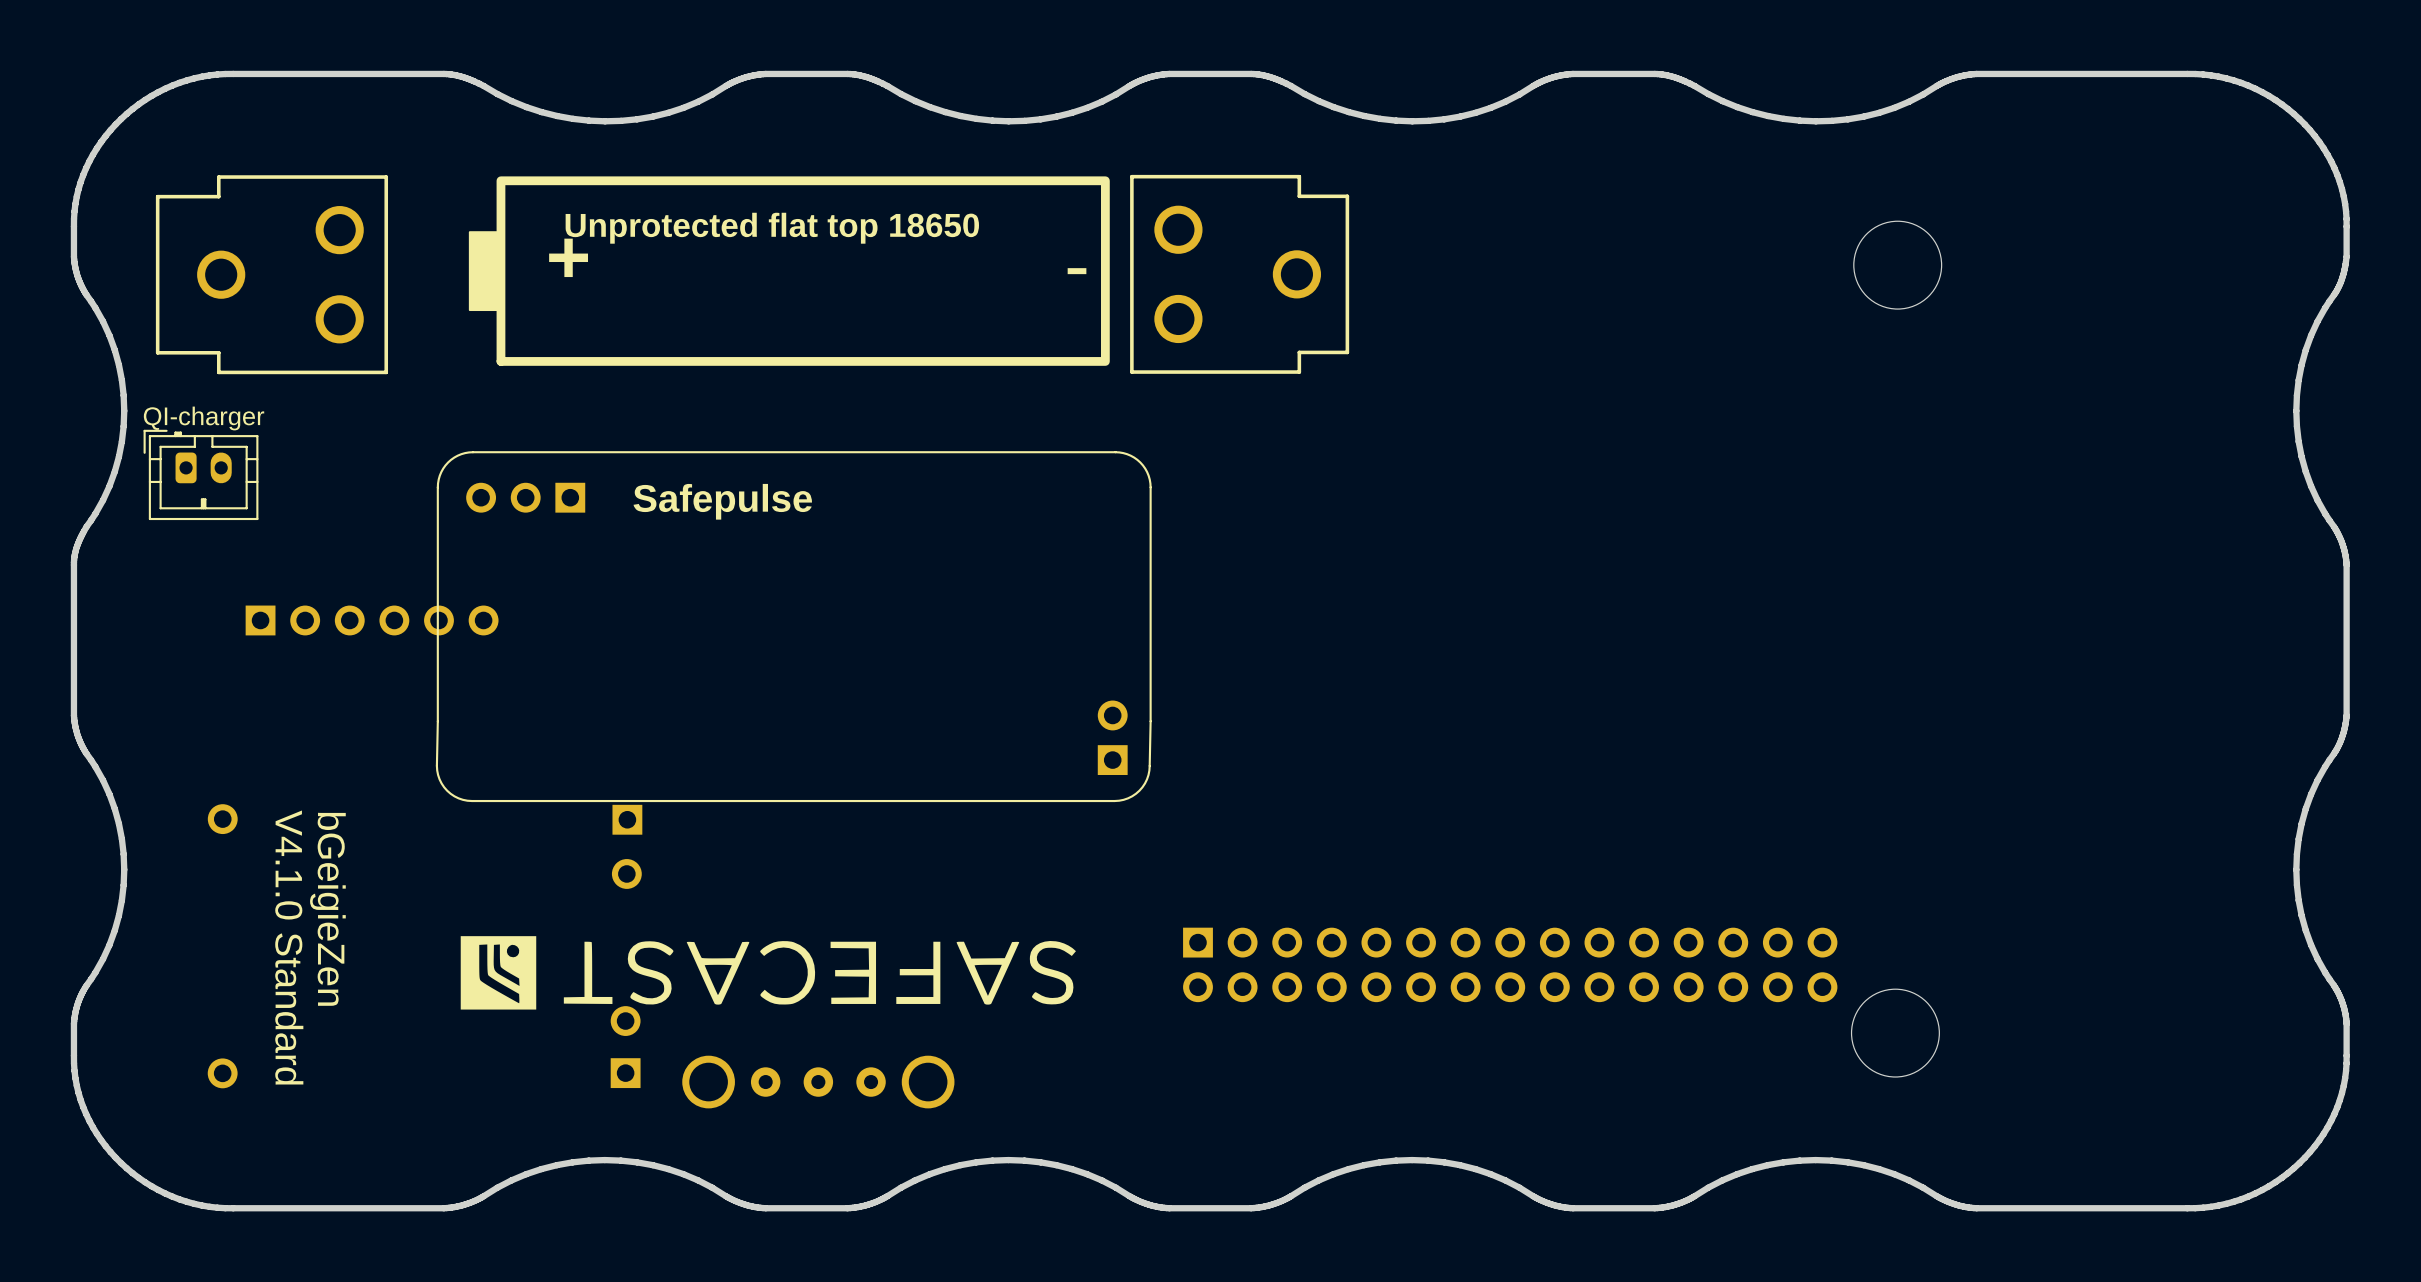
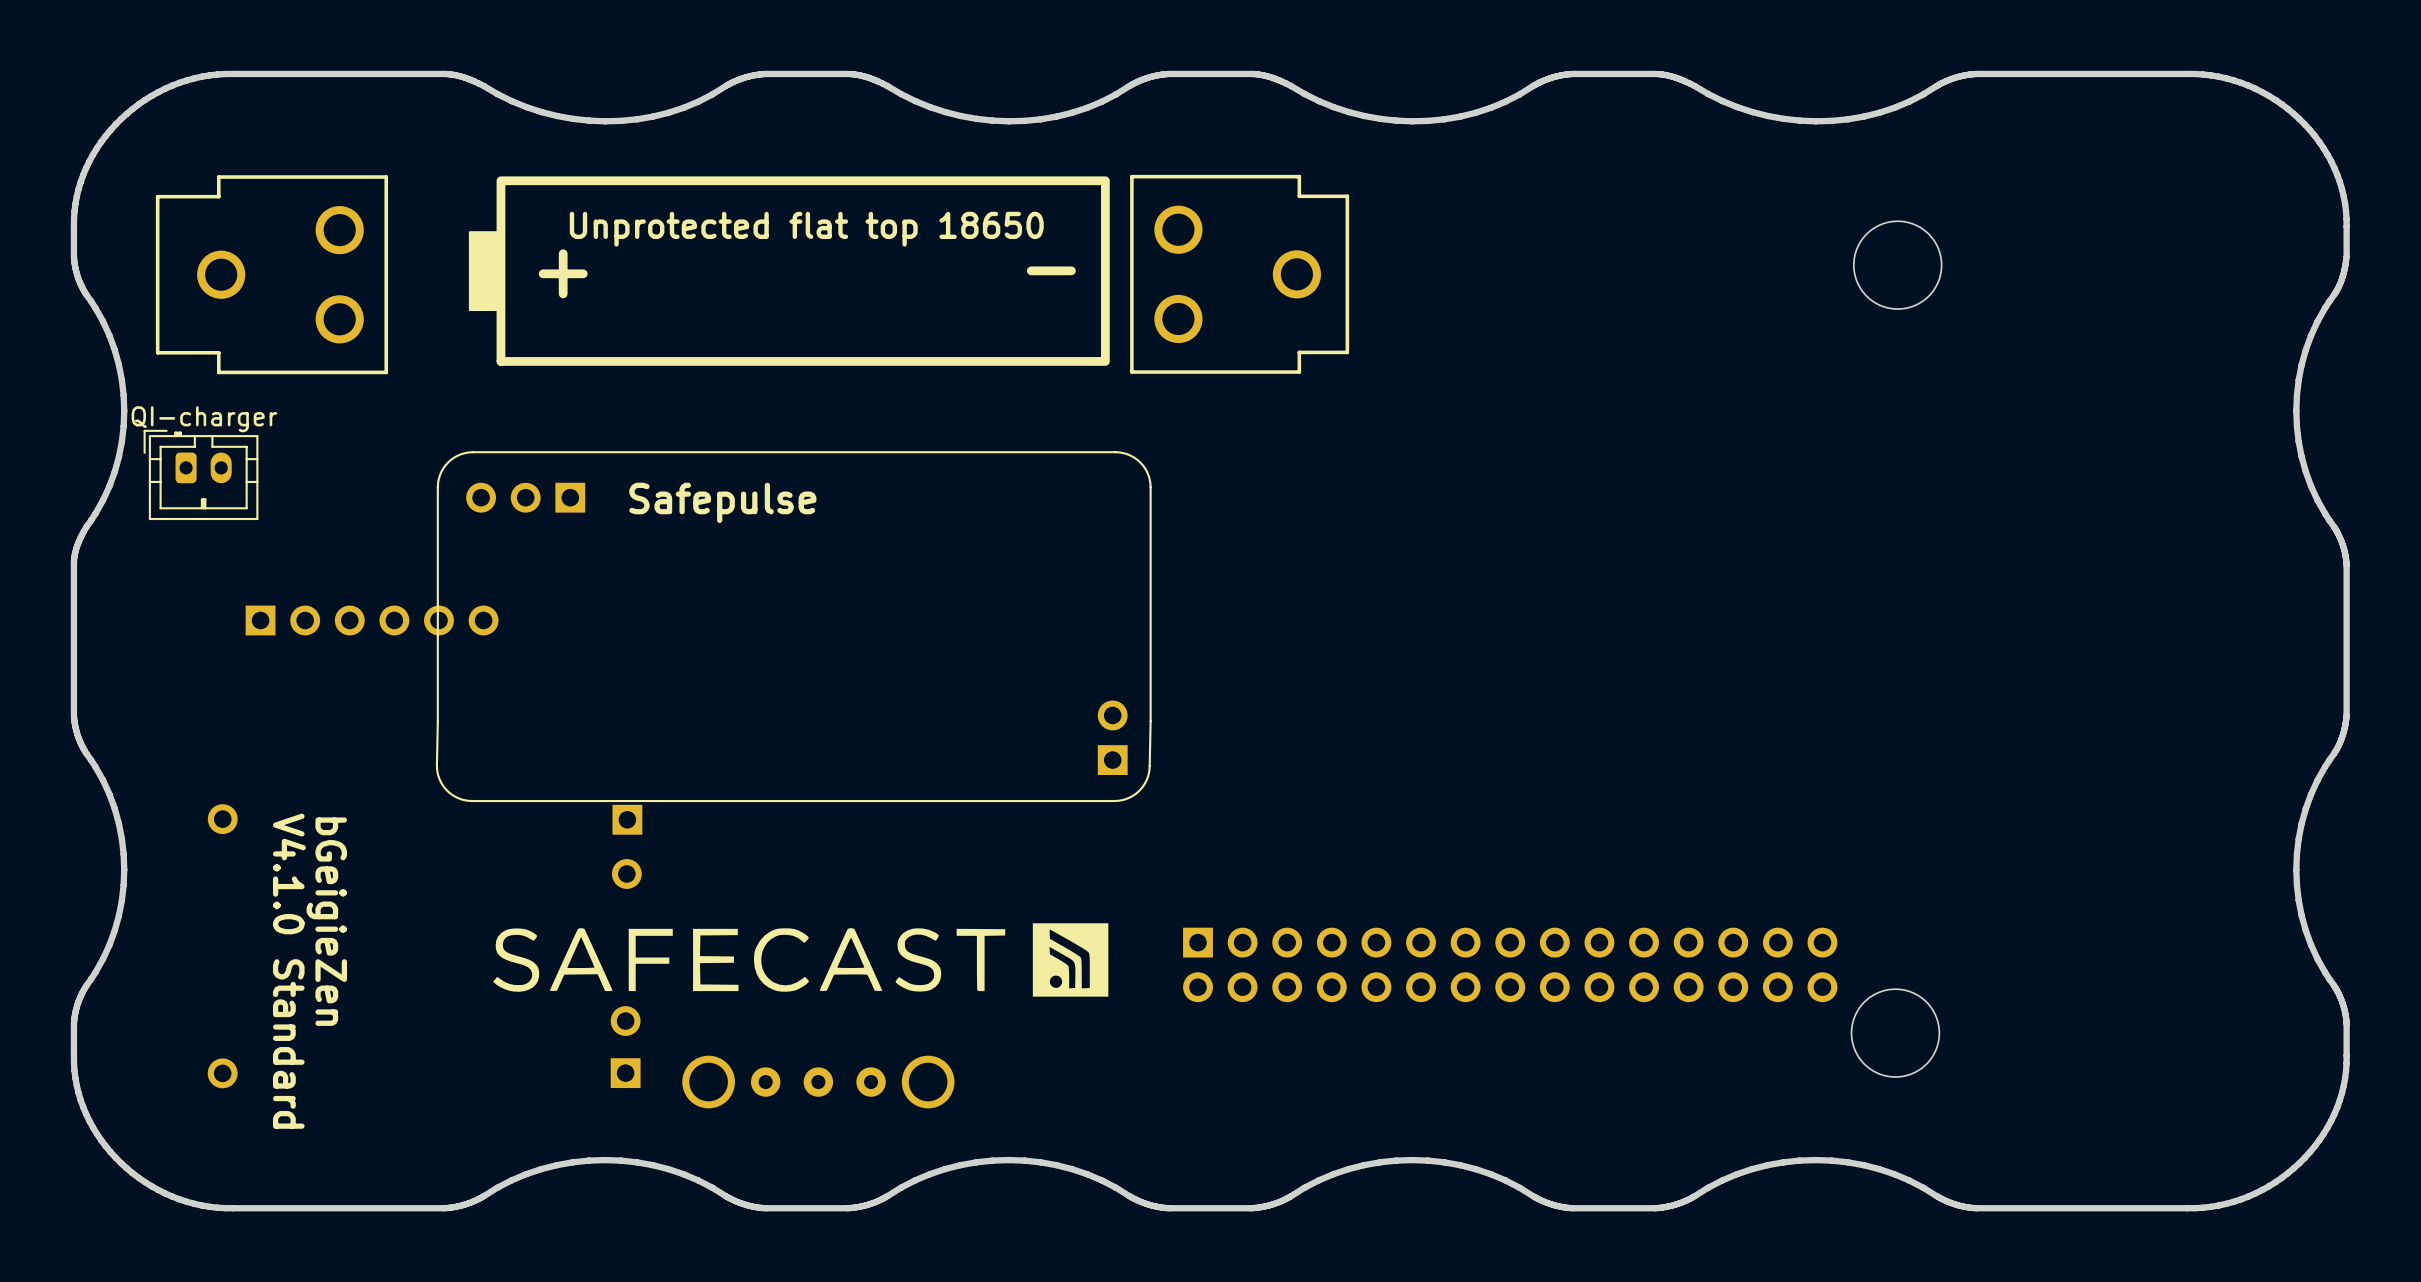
drawing: none -> [493, 923, 1109, 997]
drawing: [460, 936, 1076, 1010] -> none

